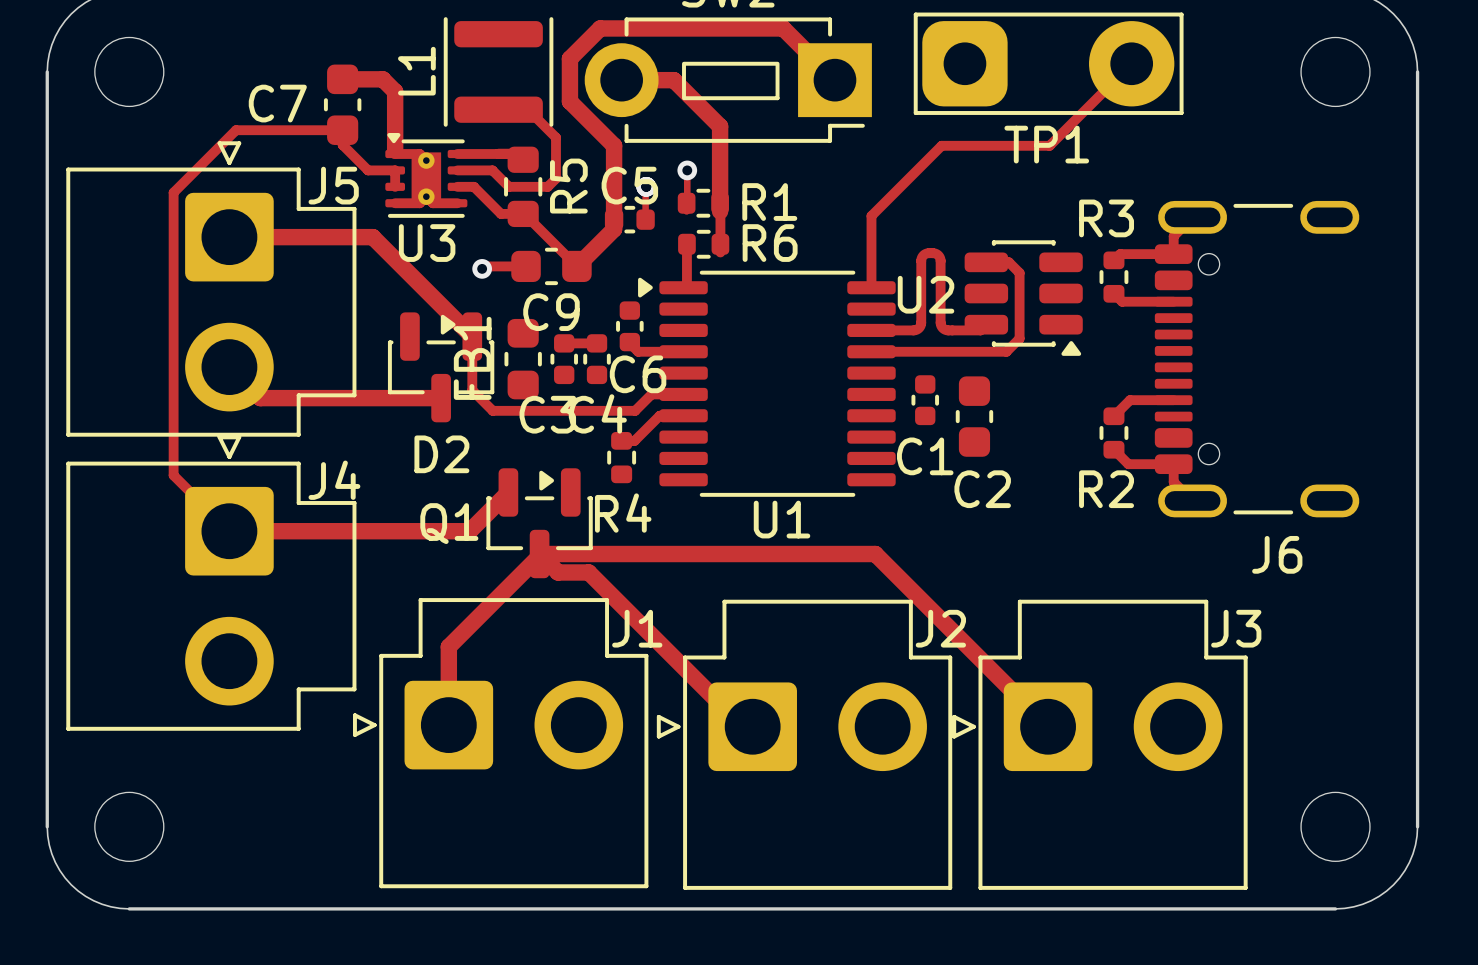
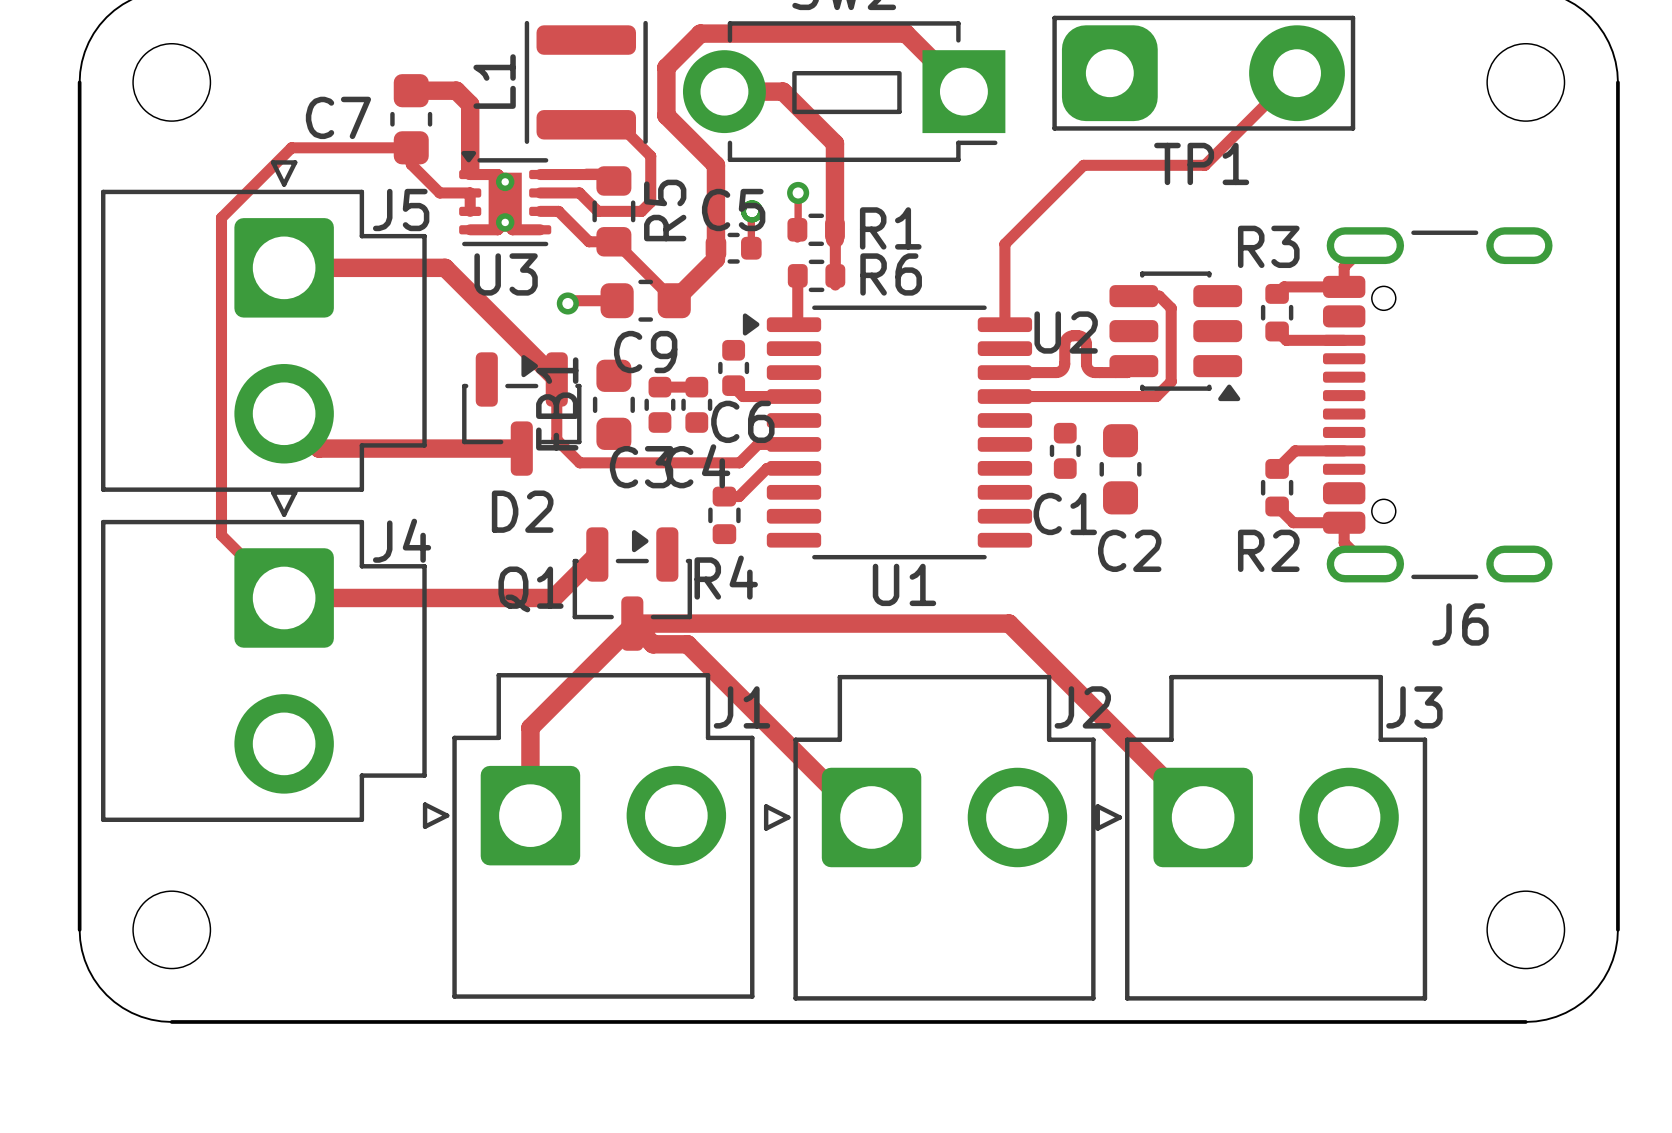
track: (913, 330) (918, 328) (920, 324) (921, 259) (923, 255) (928, 253) (936, 254) (940, 258) (940, 323) (944, 329) (951, 330) -> (1052, 372) (1059, 371) (1063, 368) (1065, 342) (1068, 337) (1073, 335) (1081, 336) (1085, 340) (1086, 366) (1089, 370) (1095, 372)

